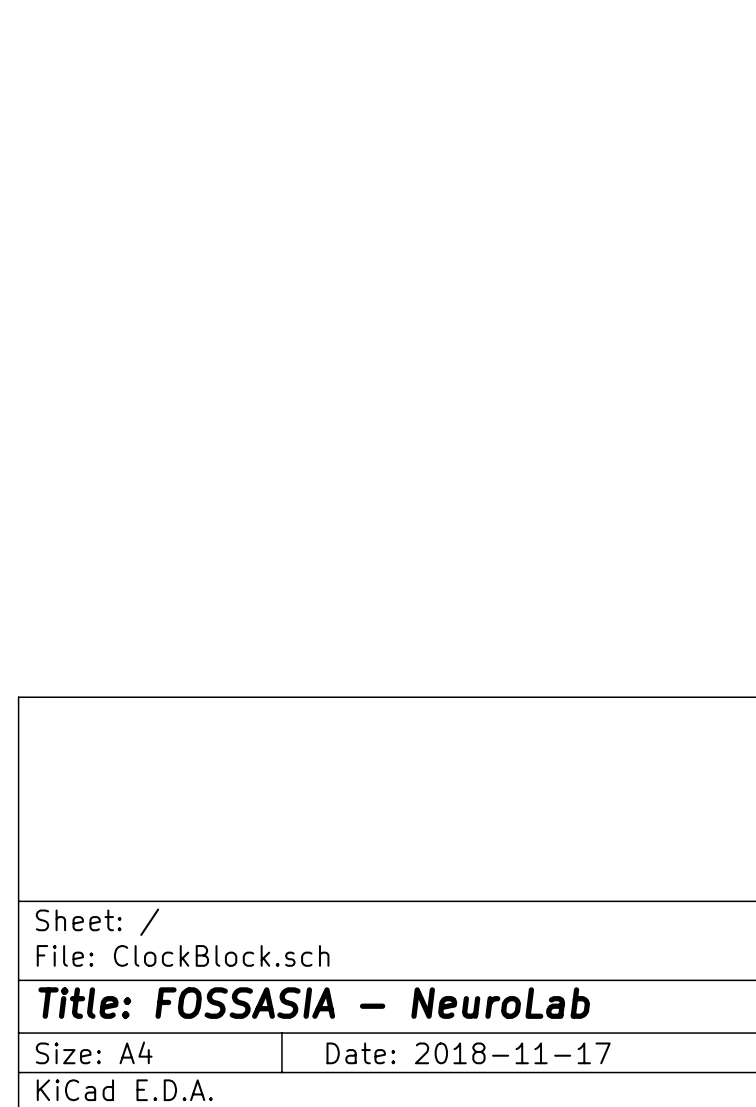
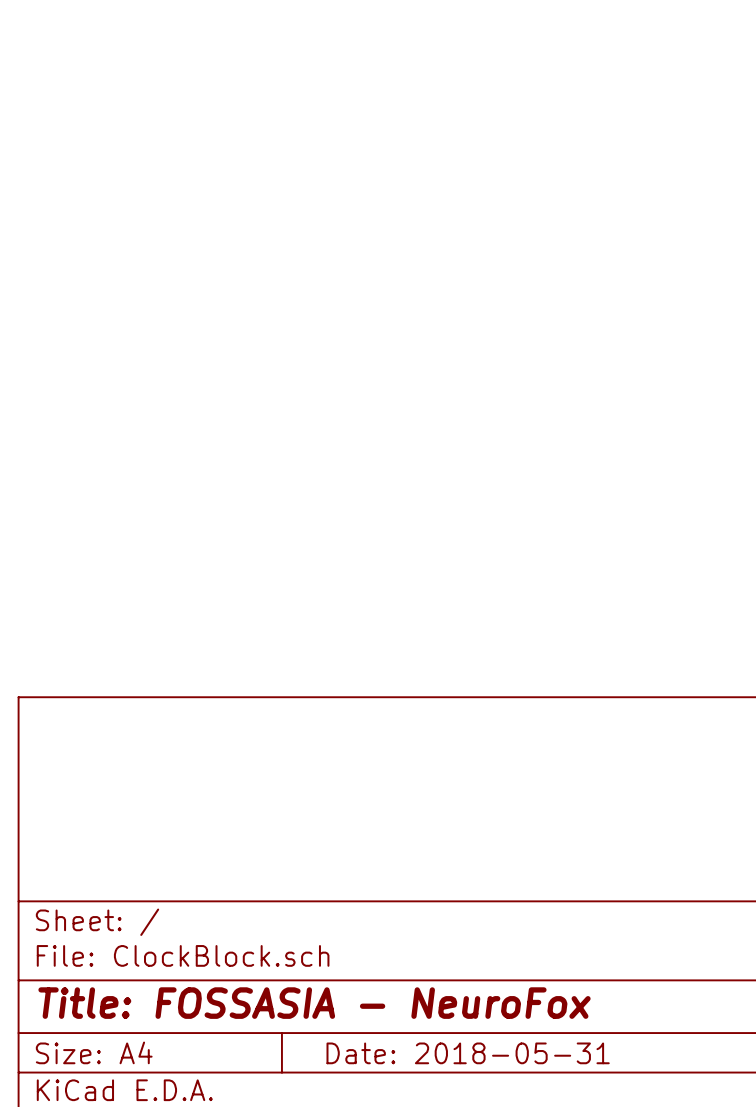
title block: Title: FOSSASIA - NeuroLab (314, 1003) -> Title: FOSSASIA - NeuroFox (314, 1003)
title block: Date: 2018-11-17 (468, 1053) -> Date: 2018-05-31 (468, 1053)

